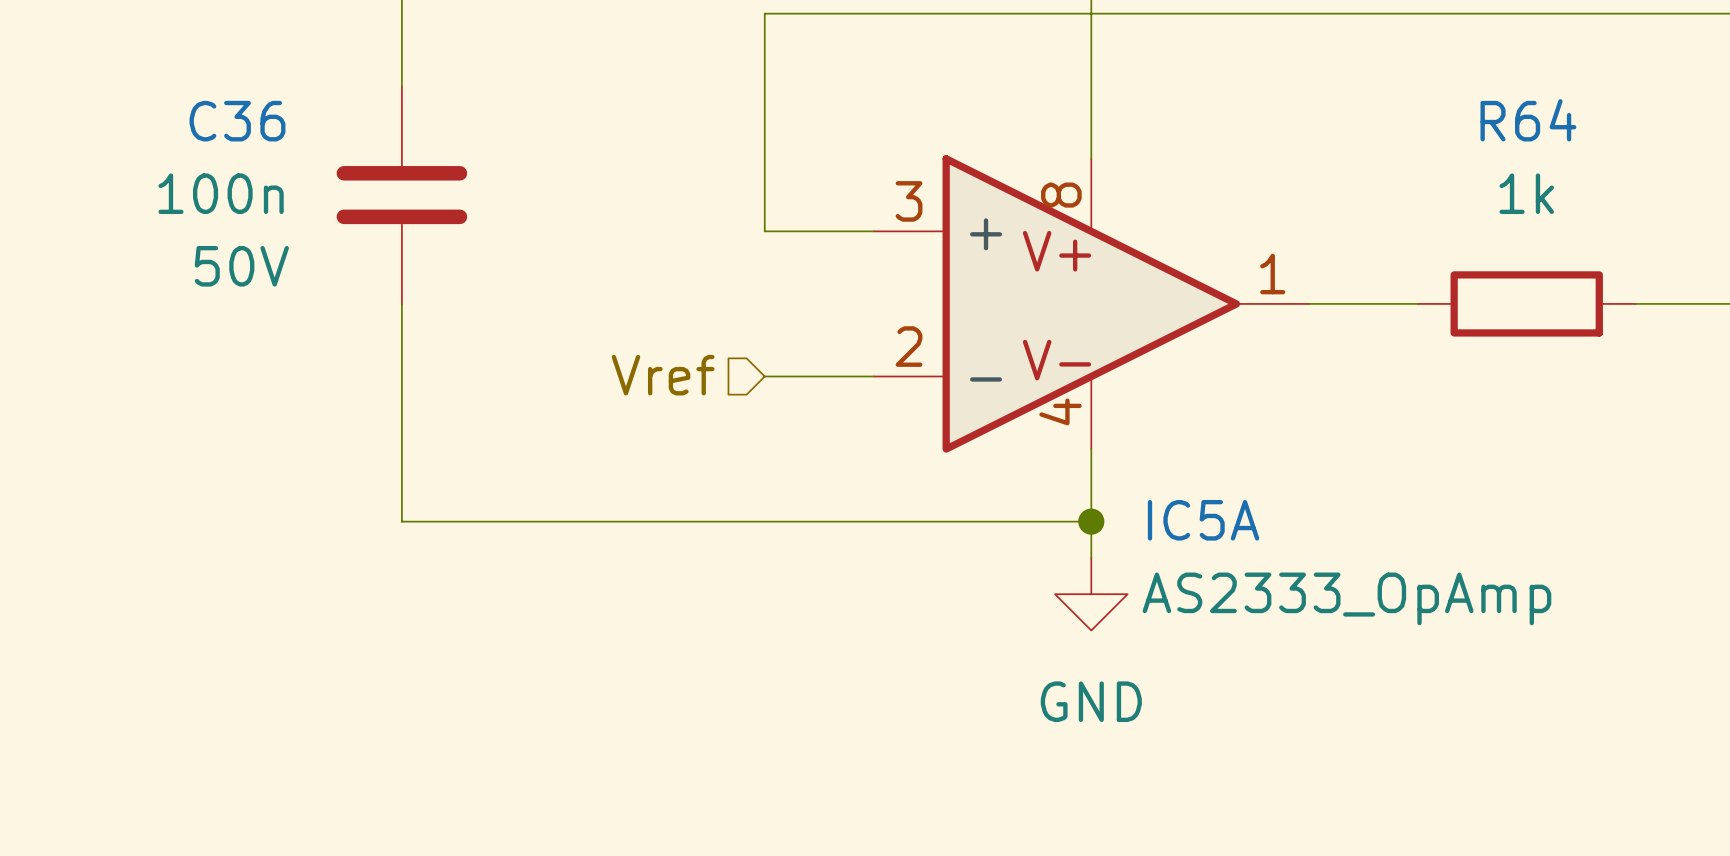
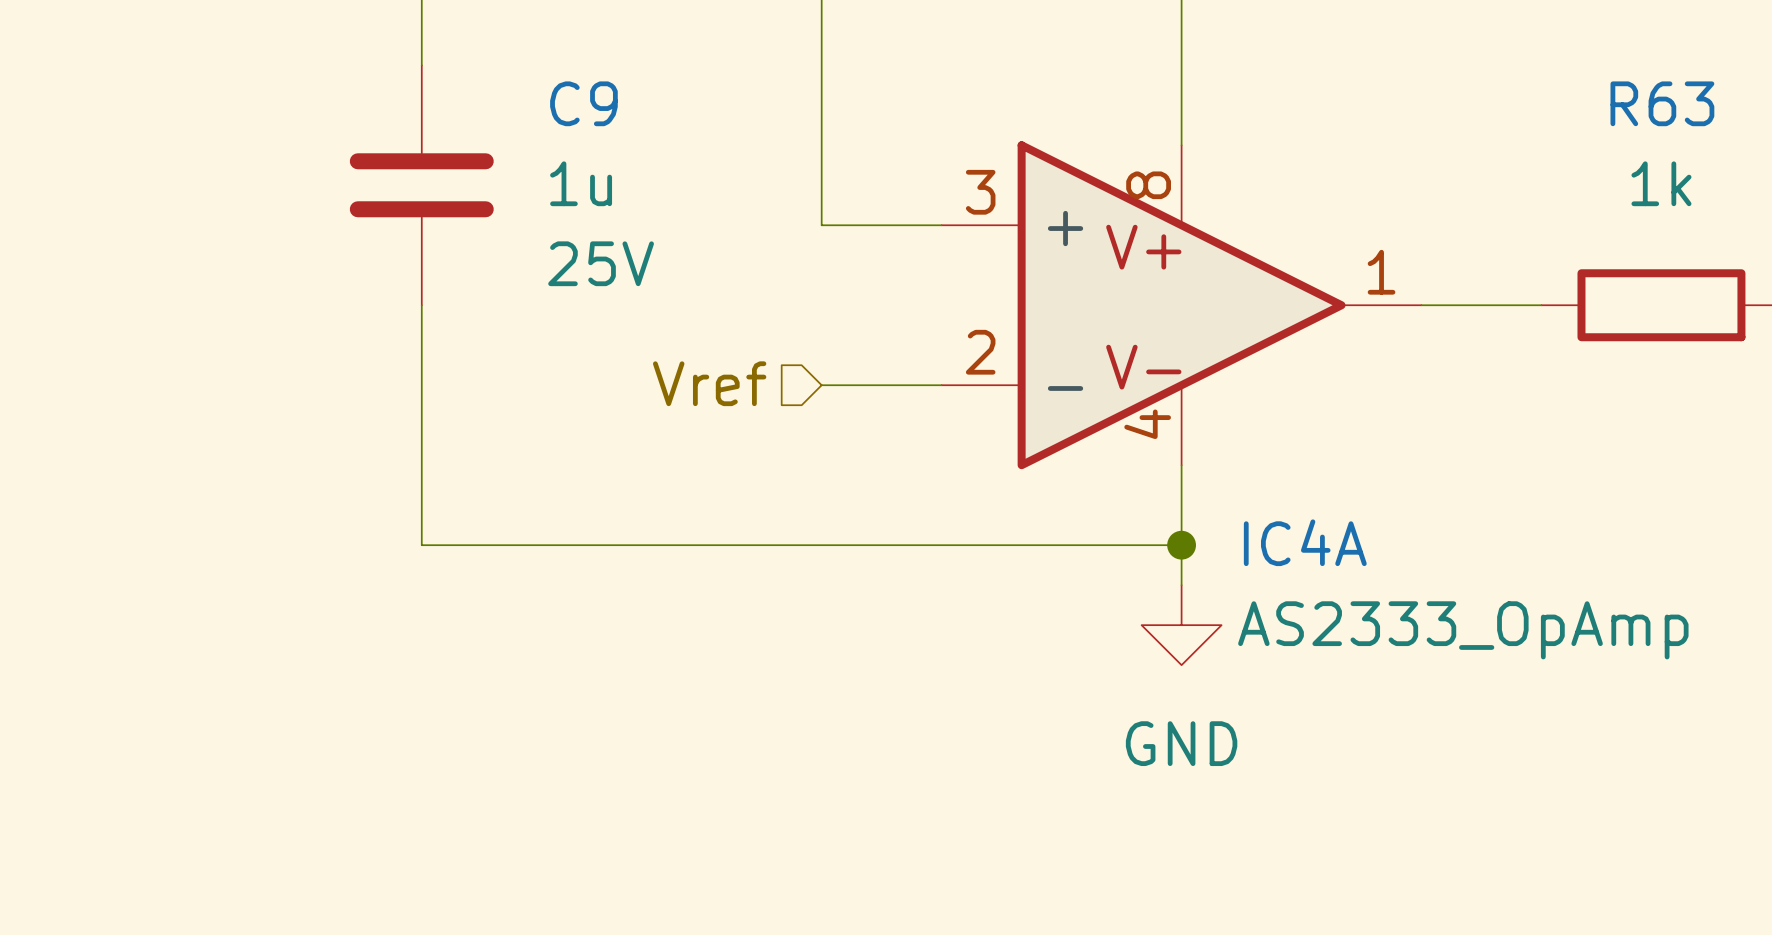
R64 name: R64 (1528, 120) -> R63 (1662, 103)
C36 name: C36 (237, 121) -> C9 (583, 103)
C36 value: 100n (221, 193) -> 1u (581, 183)
C36 text: 50V (241, 266) -> 25V (601, 263)
IC5A name: IC5A (1203, 520) -> IC4A (1305, 542)

